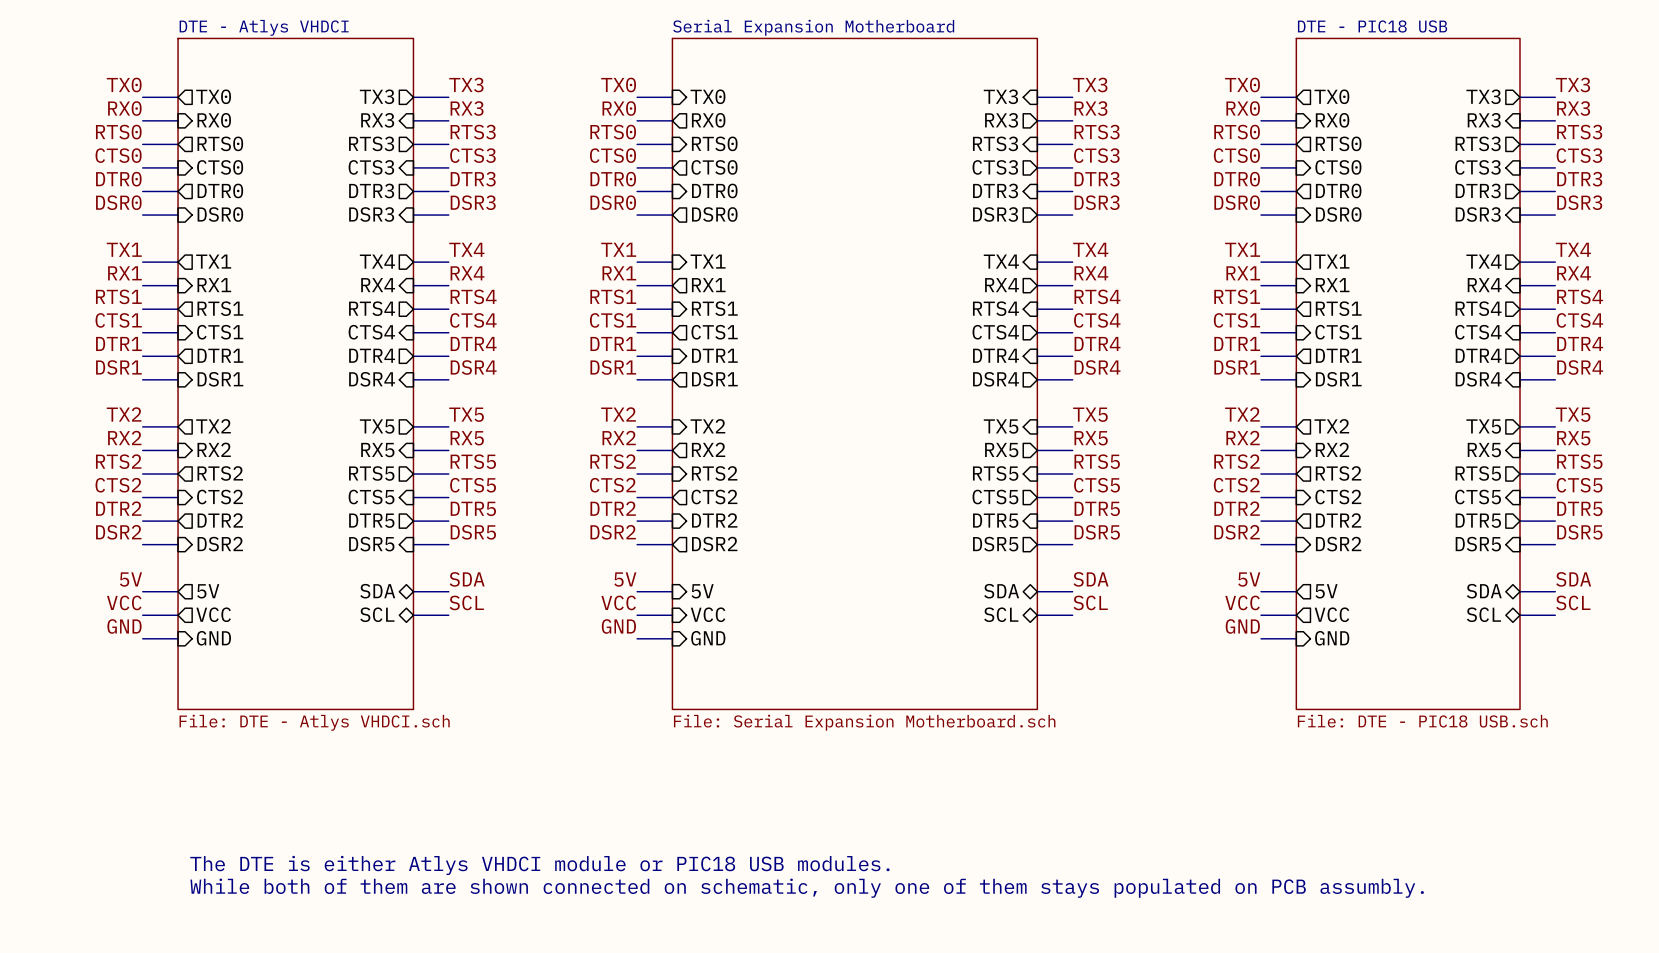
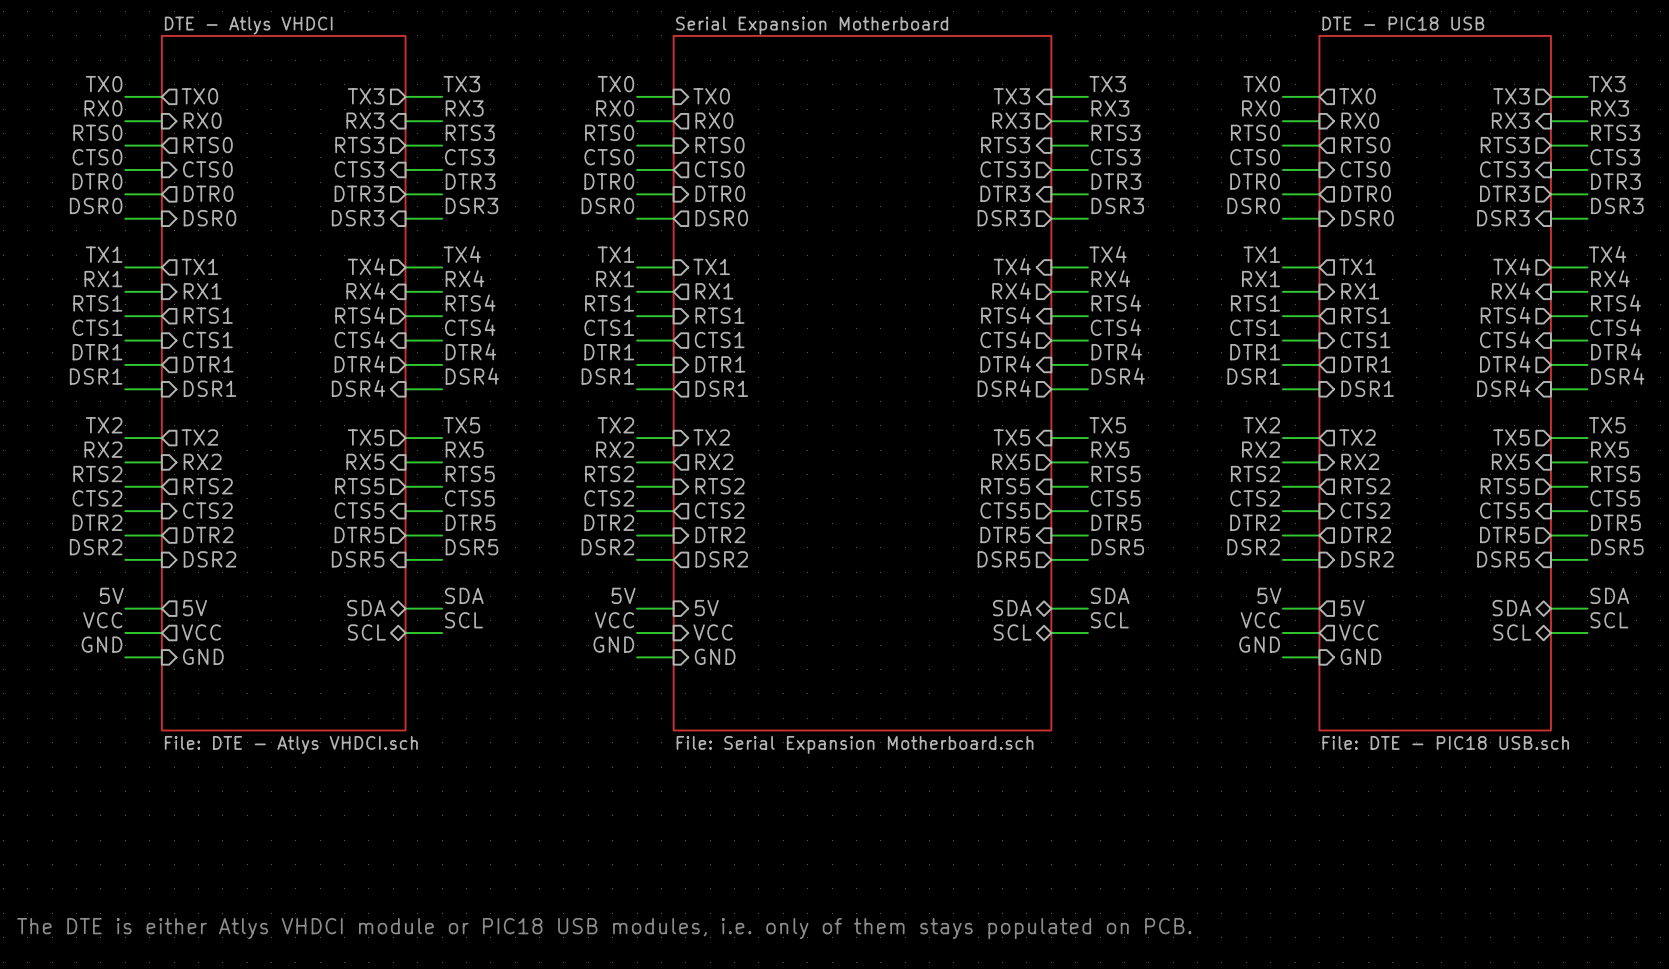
text: The DTE is either Atlys VHDCI module or PIC18 USB modules. (539, 865) -> none
text: While both of them are shown connected on schematic, only one of them stays populated on PCB assumbly. (807, 888) -> none
text: none -> The DTE is either Atlys VHDCI module or PIC18 USB modules, i.e. only of them stays populated on PCB. (604, 928)

